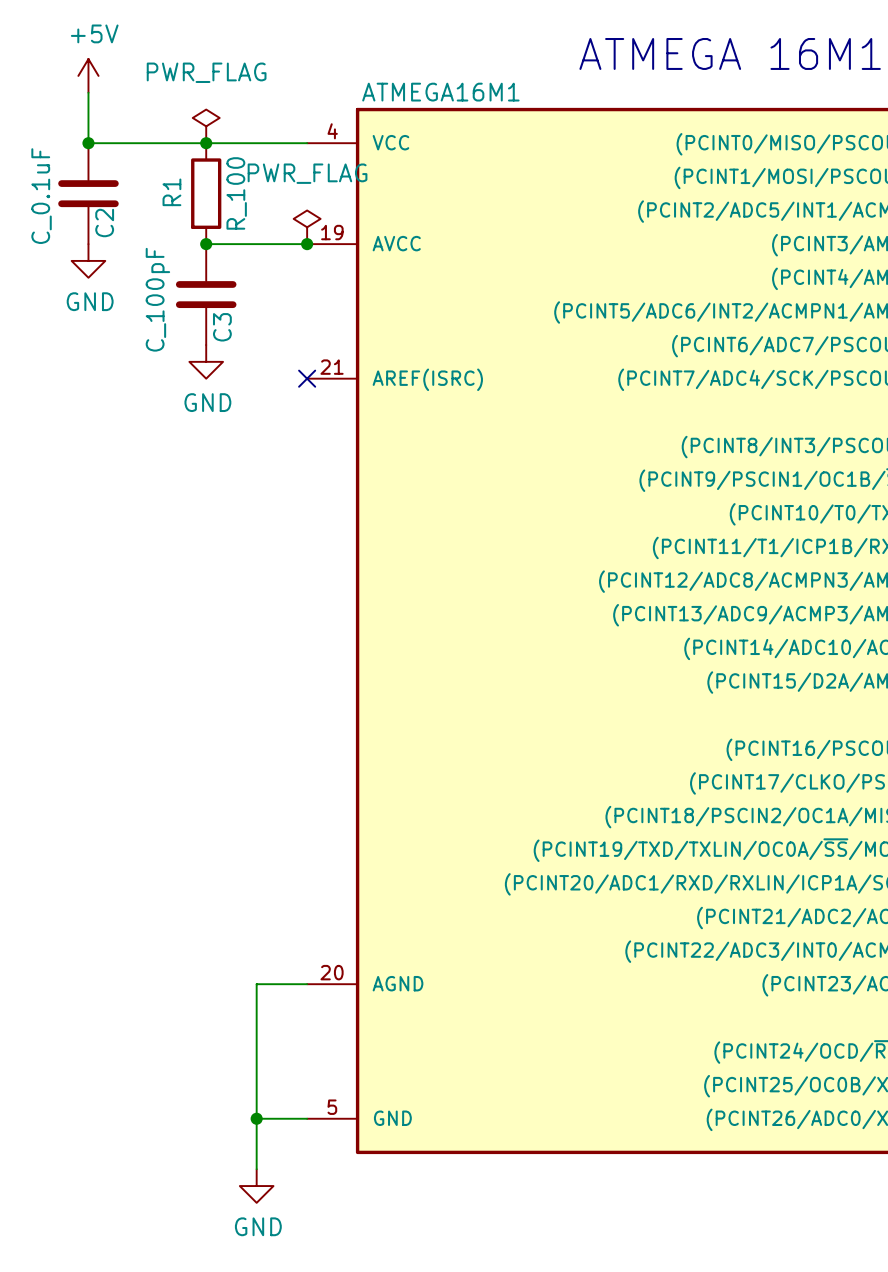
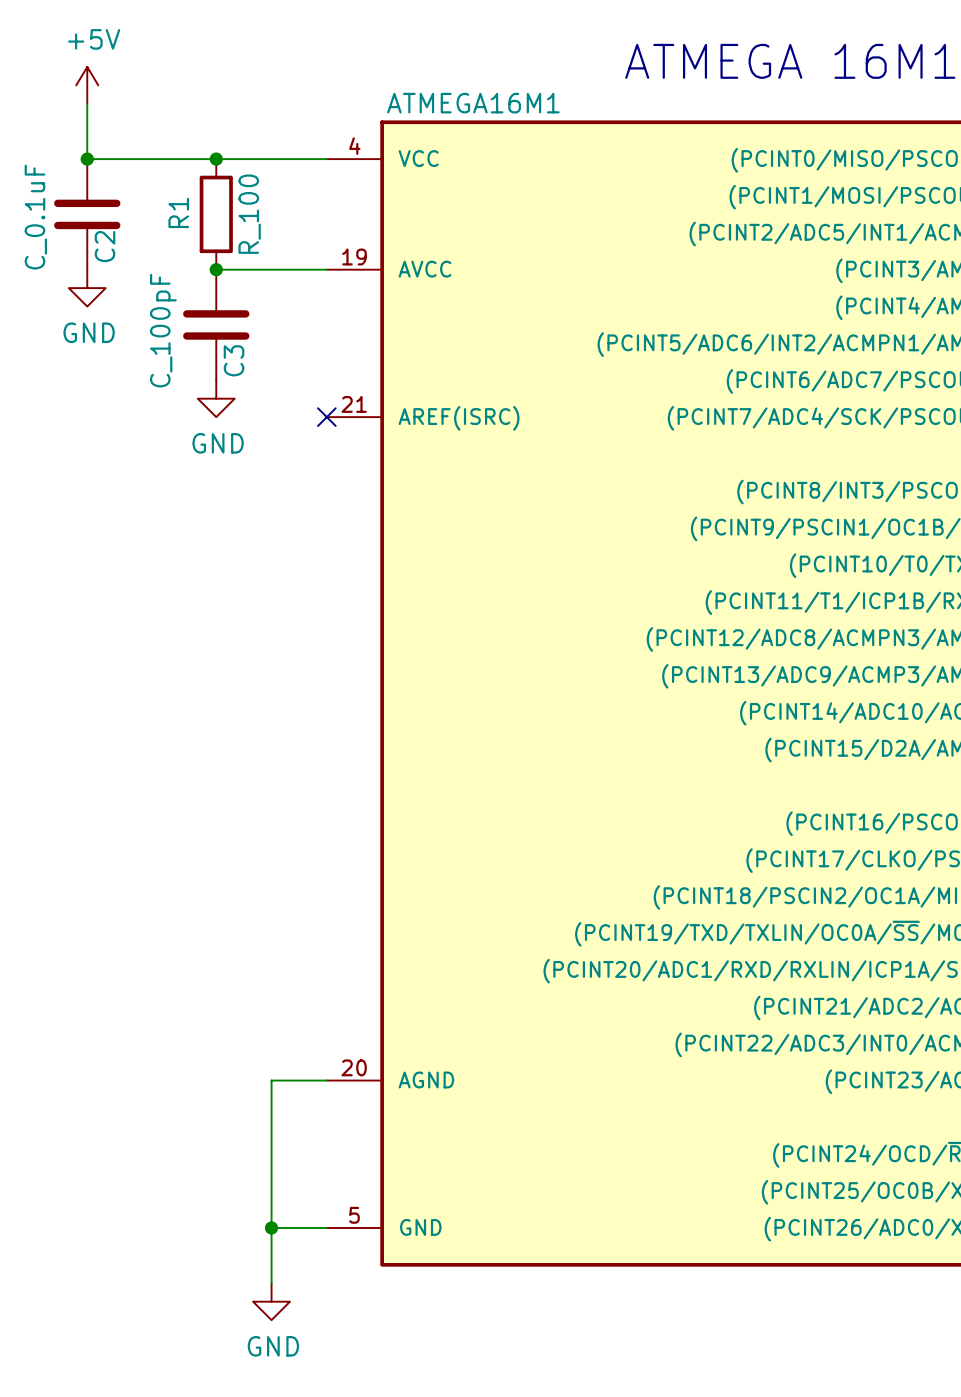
power symbol: PWR_FLAG (206, 126) -> none
power symbol: PWR_FLAG (307, 227) -> none
junction: (307, 244) -> none

